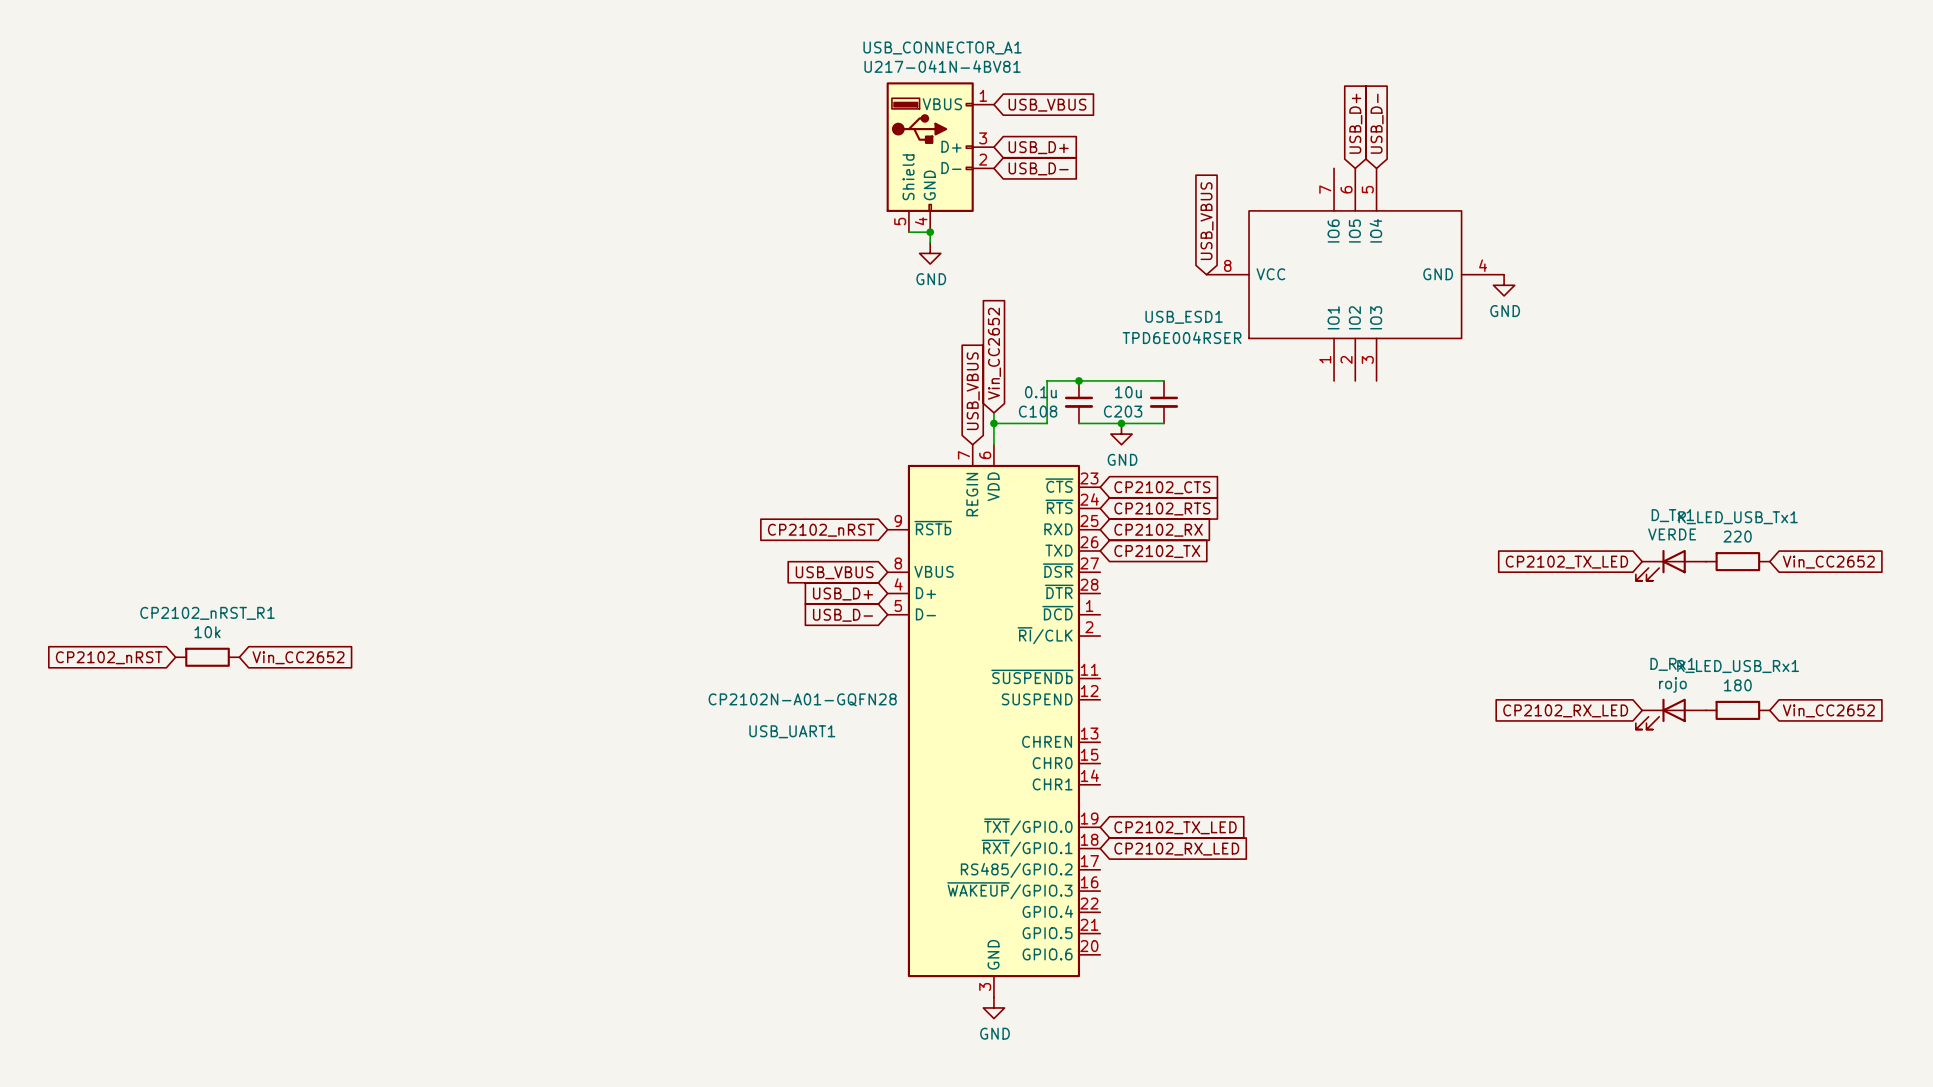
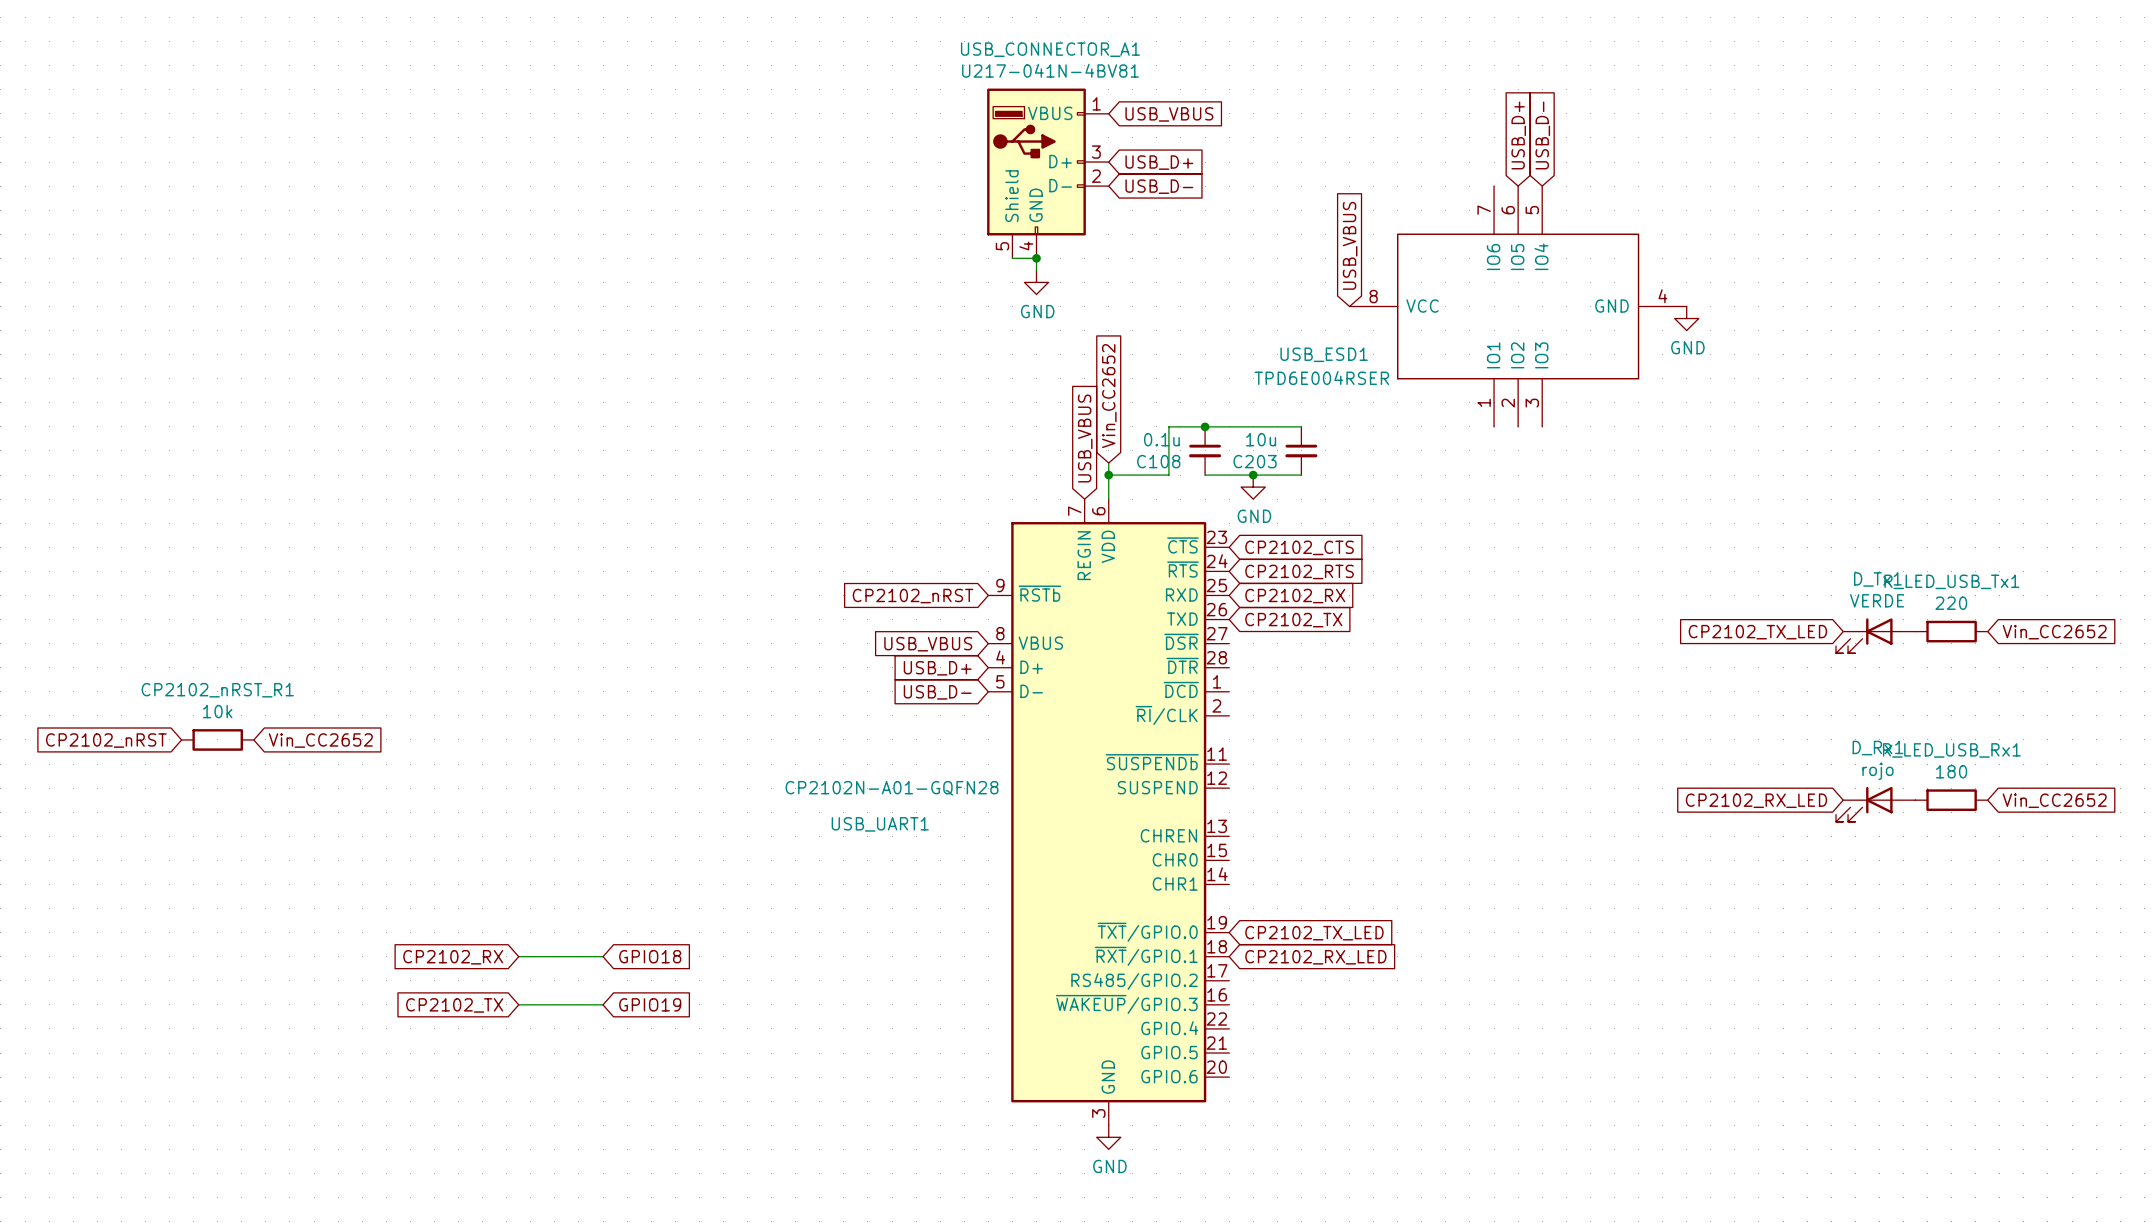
wire: none -> (518, 956) (603, 956)
global label: none -> GPIO18 (650, 956)
global label: none -> CP2102_RX (453, 957)
global label: none -> CP2102_TX (454, 1005)
wire: none -> (518, 1004) (603, 1004)
global label: none -> GPIO19 (650, 1004)

